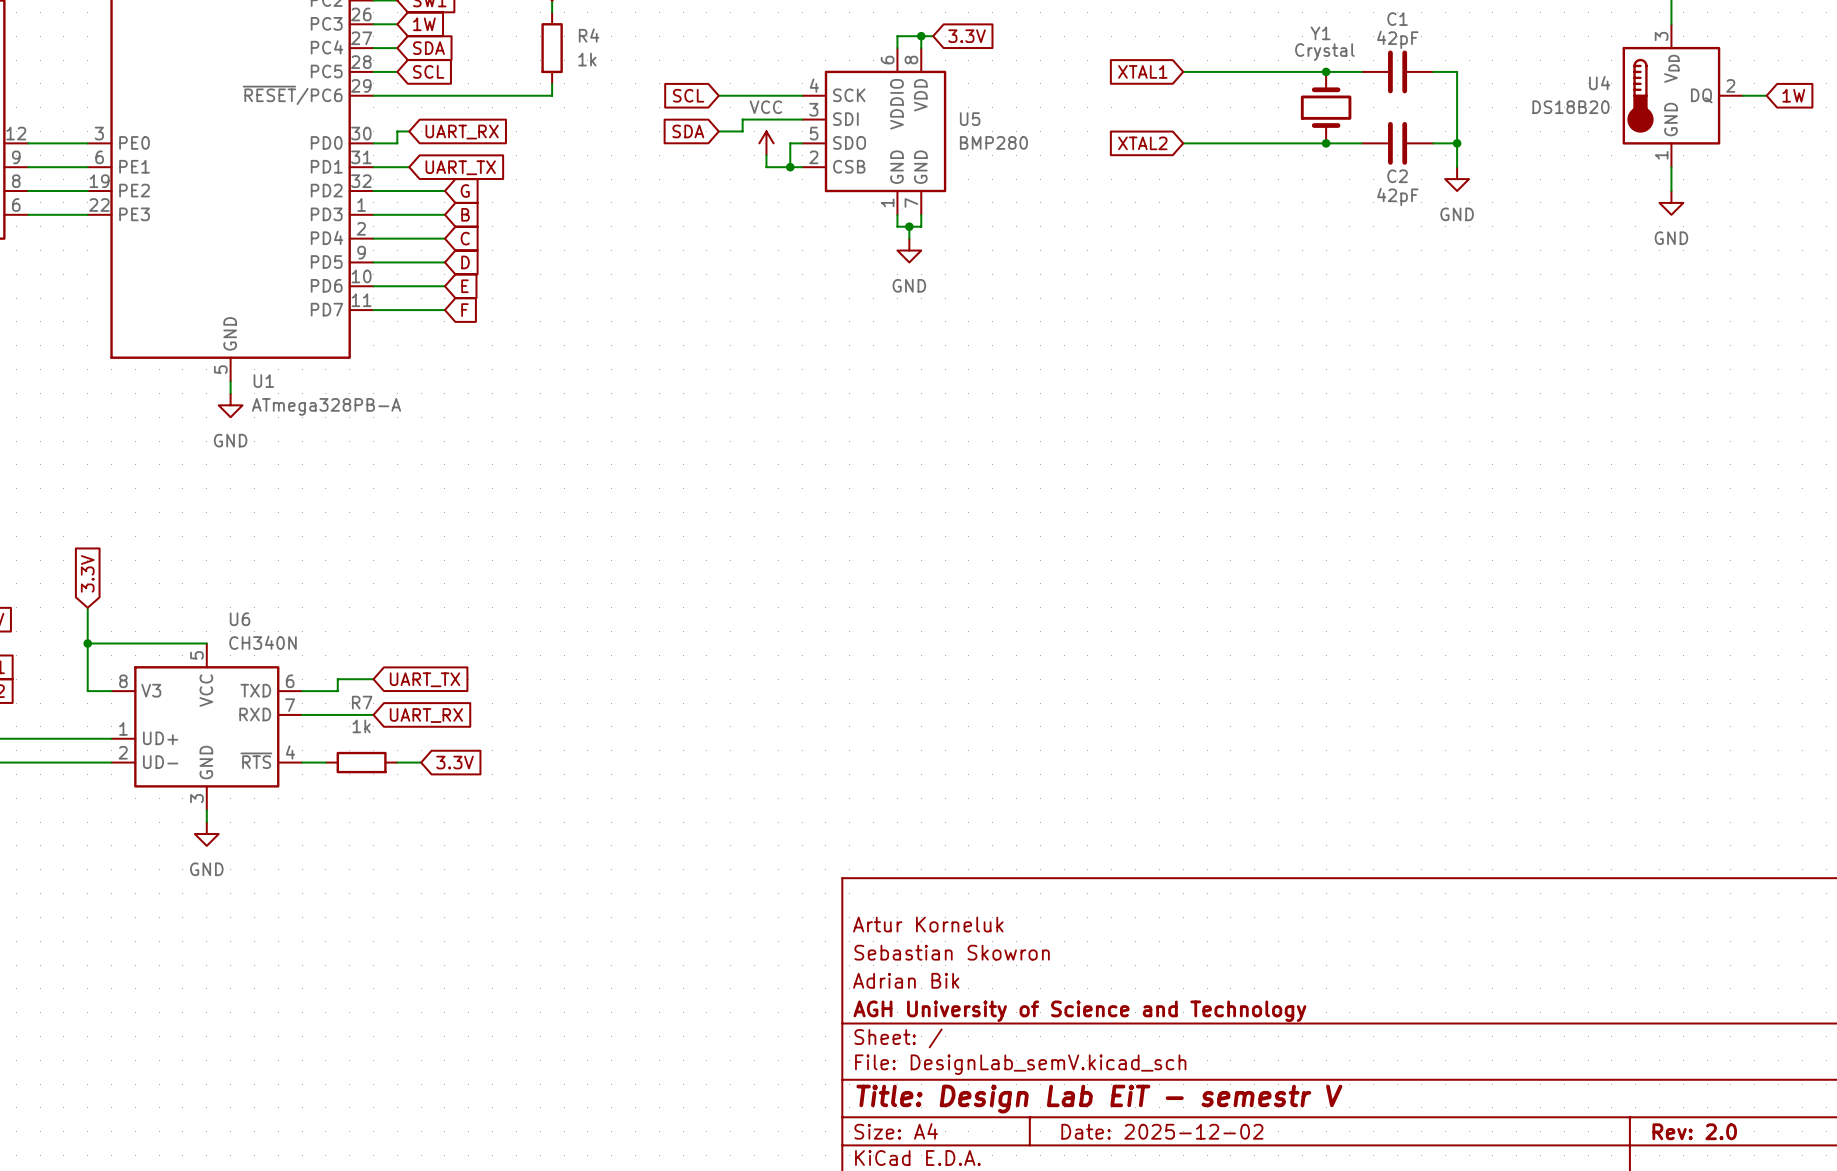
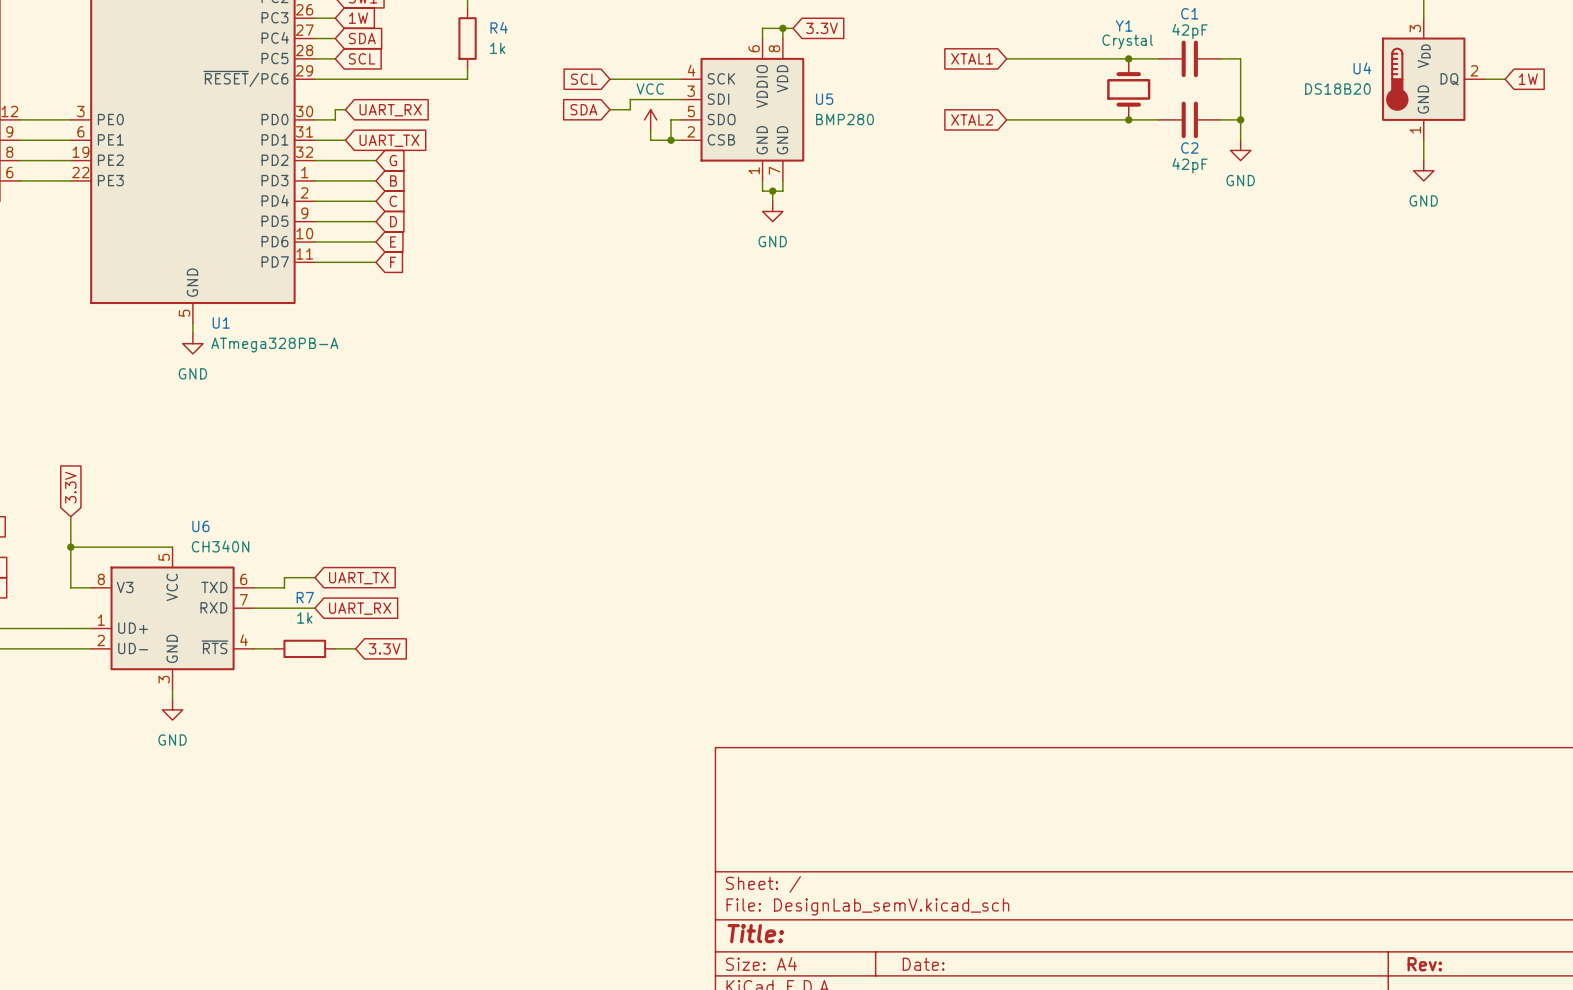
title block: Artur Korneluk (928, 924) -> none
title block: Sebastian Skowron (952, 952) -> none
title block: Adrian Bik (906, 980) -> none
title block: AGH University of Science and Technology (1079, 1011) -> none
title block: Title: Design Lab EiT - semestr V (1099, 1099) -> Title: (755, 933)
title block: Date: 2025-12-02 (1162, 1131) -> Date: (923, 964)
title block: Rev: 2.0 (1694, 1131) -> Rev: (1424, 964)

